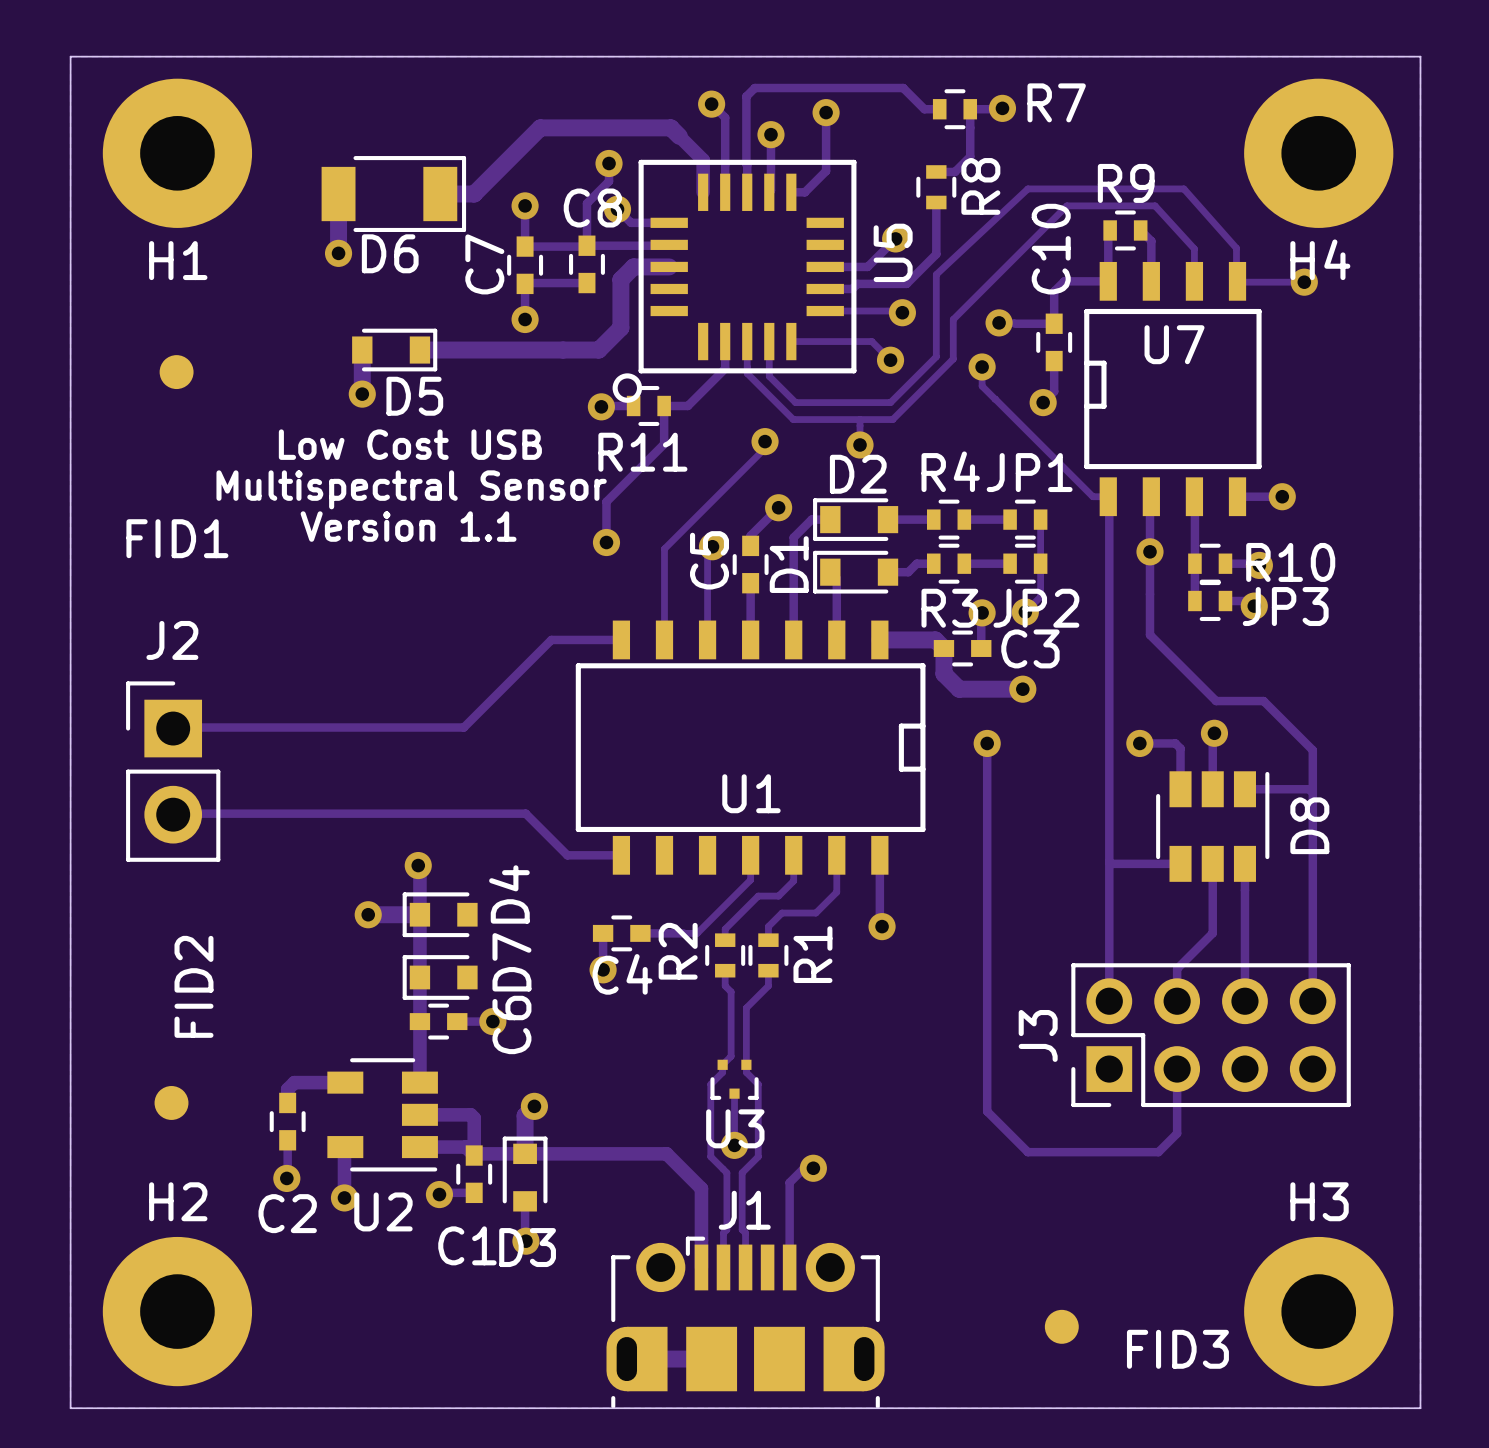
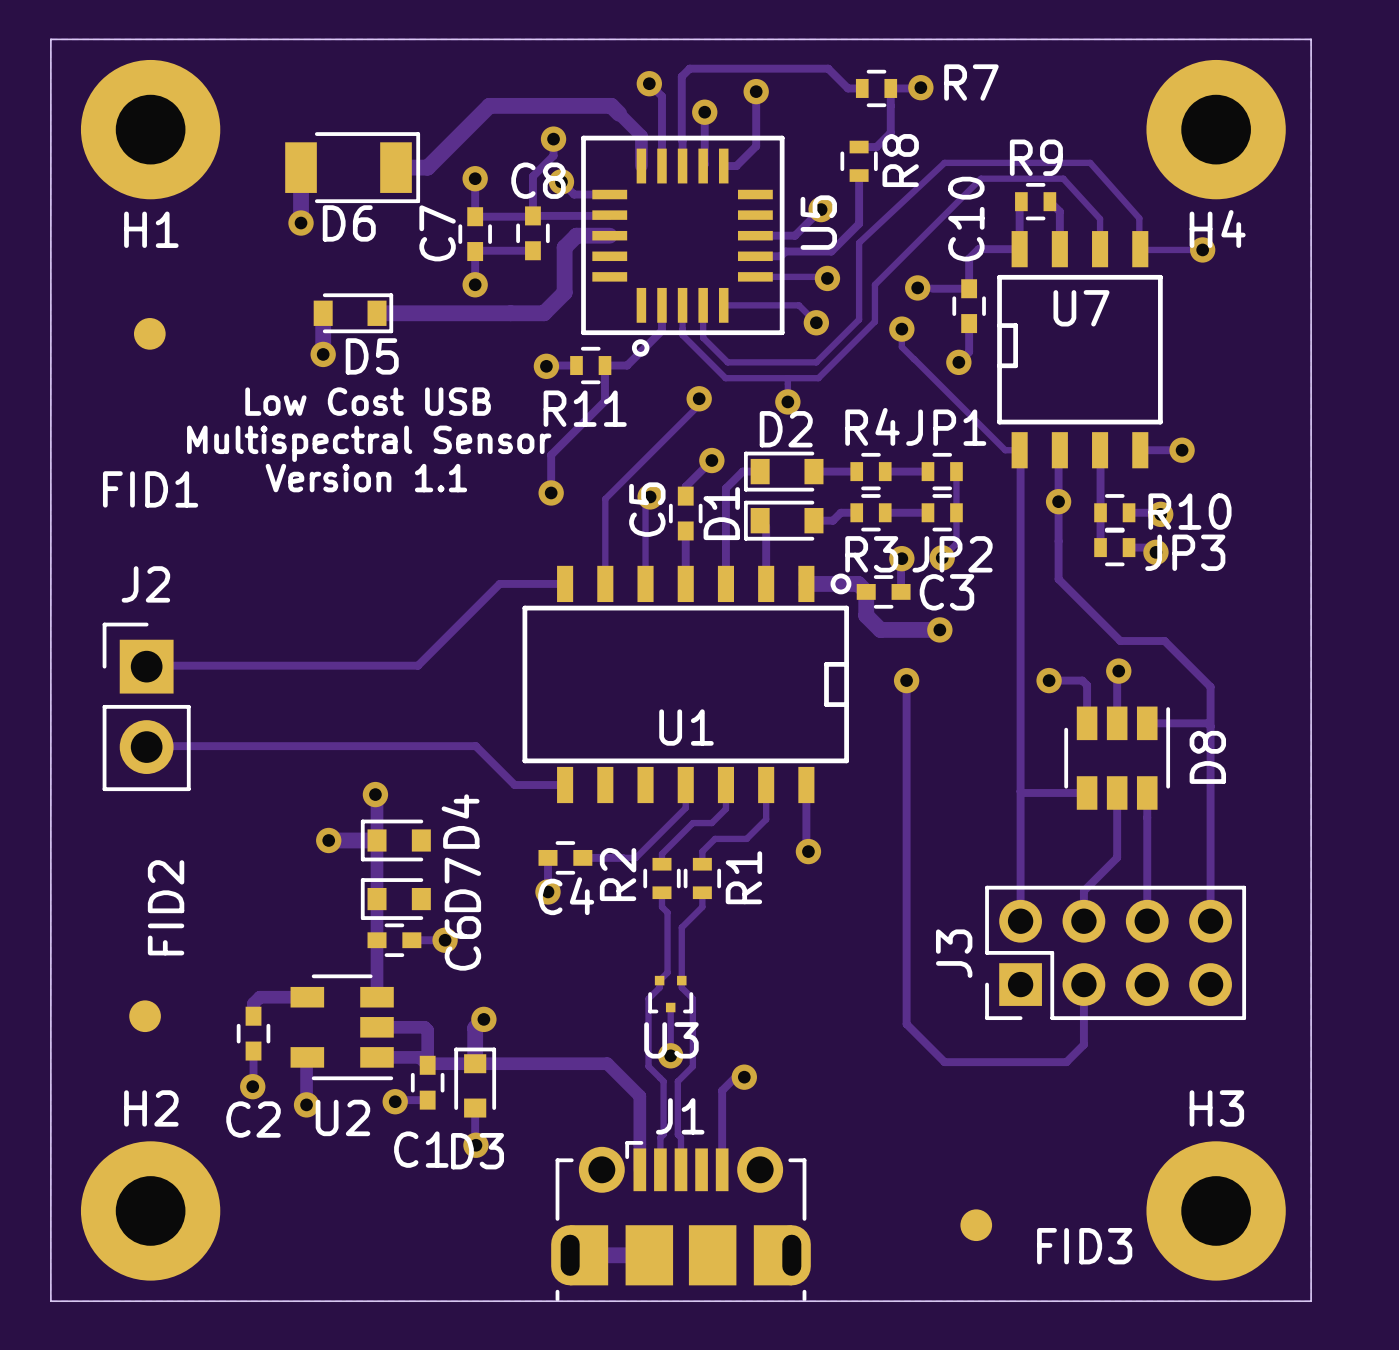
U5 footprint: [612, 159, 857, 403] -> [581, 135, 785, 357]
U1 footprint: [575, 620, 926, 875] -> [522, 565, 852, 804]

